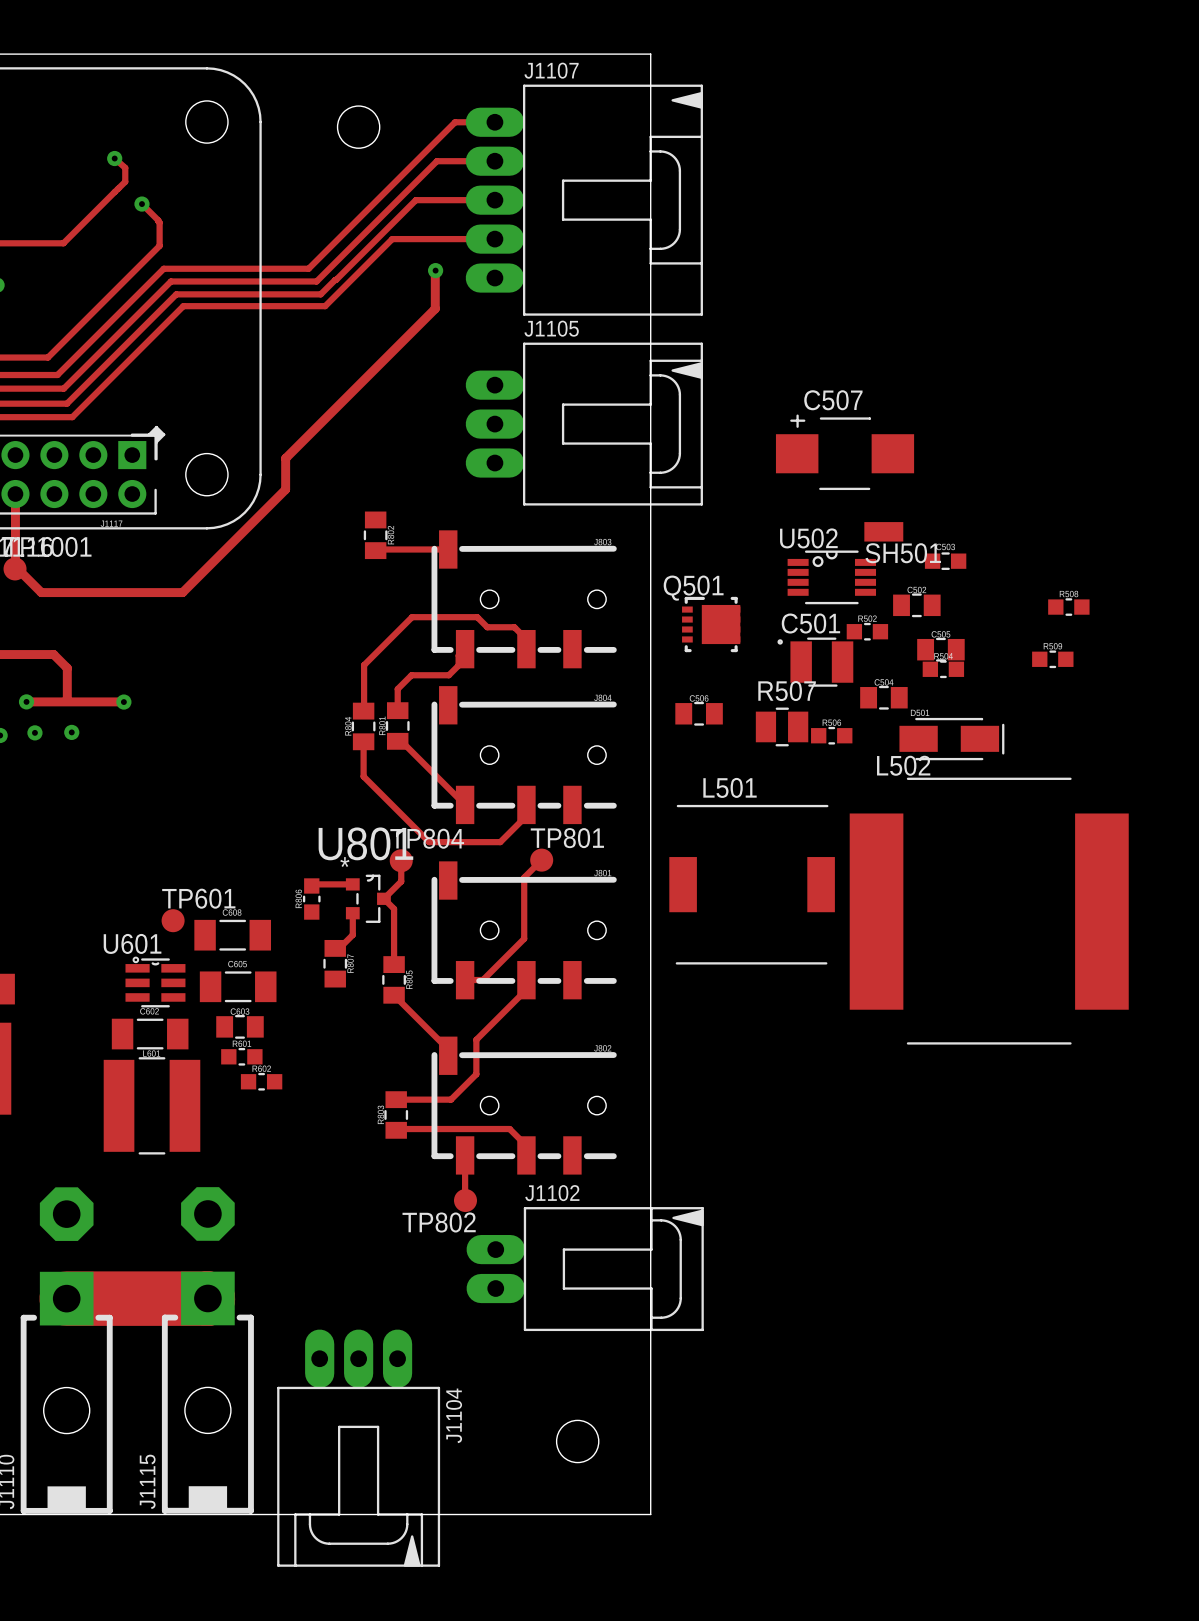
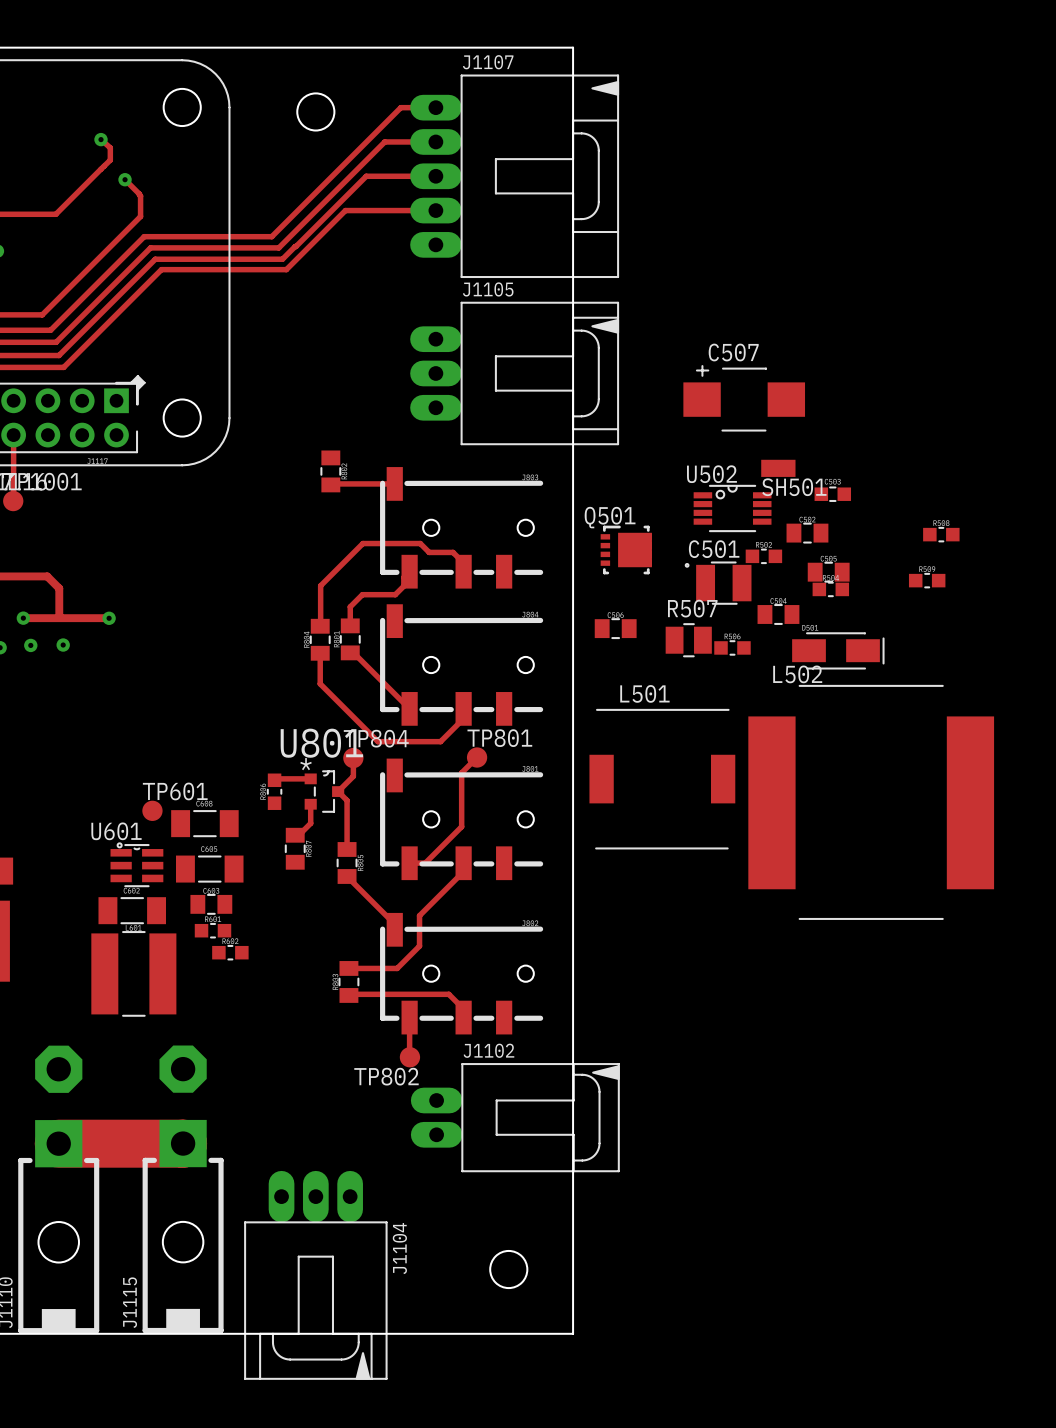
track: (435, 270) (435, 308) (285, 458) (285, 489) (182, 592) (41, 592) (15, 566) (15, 494) -> none
via: (435, 270) -> none

